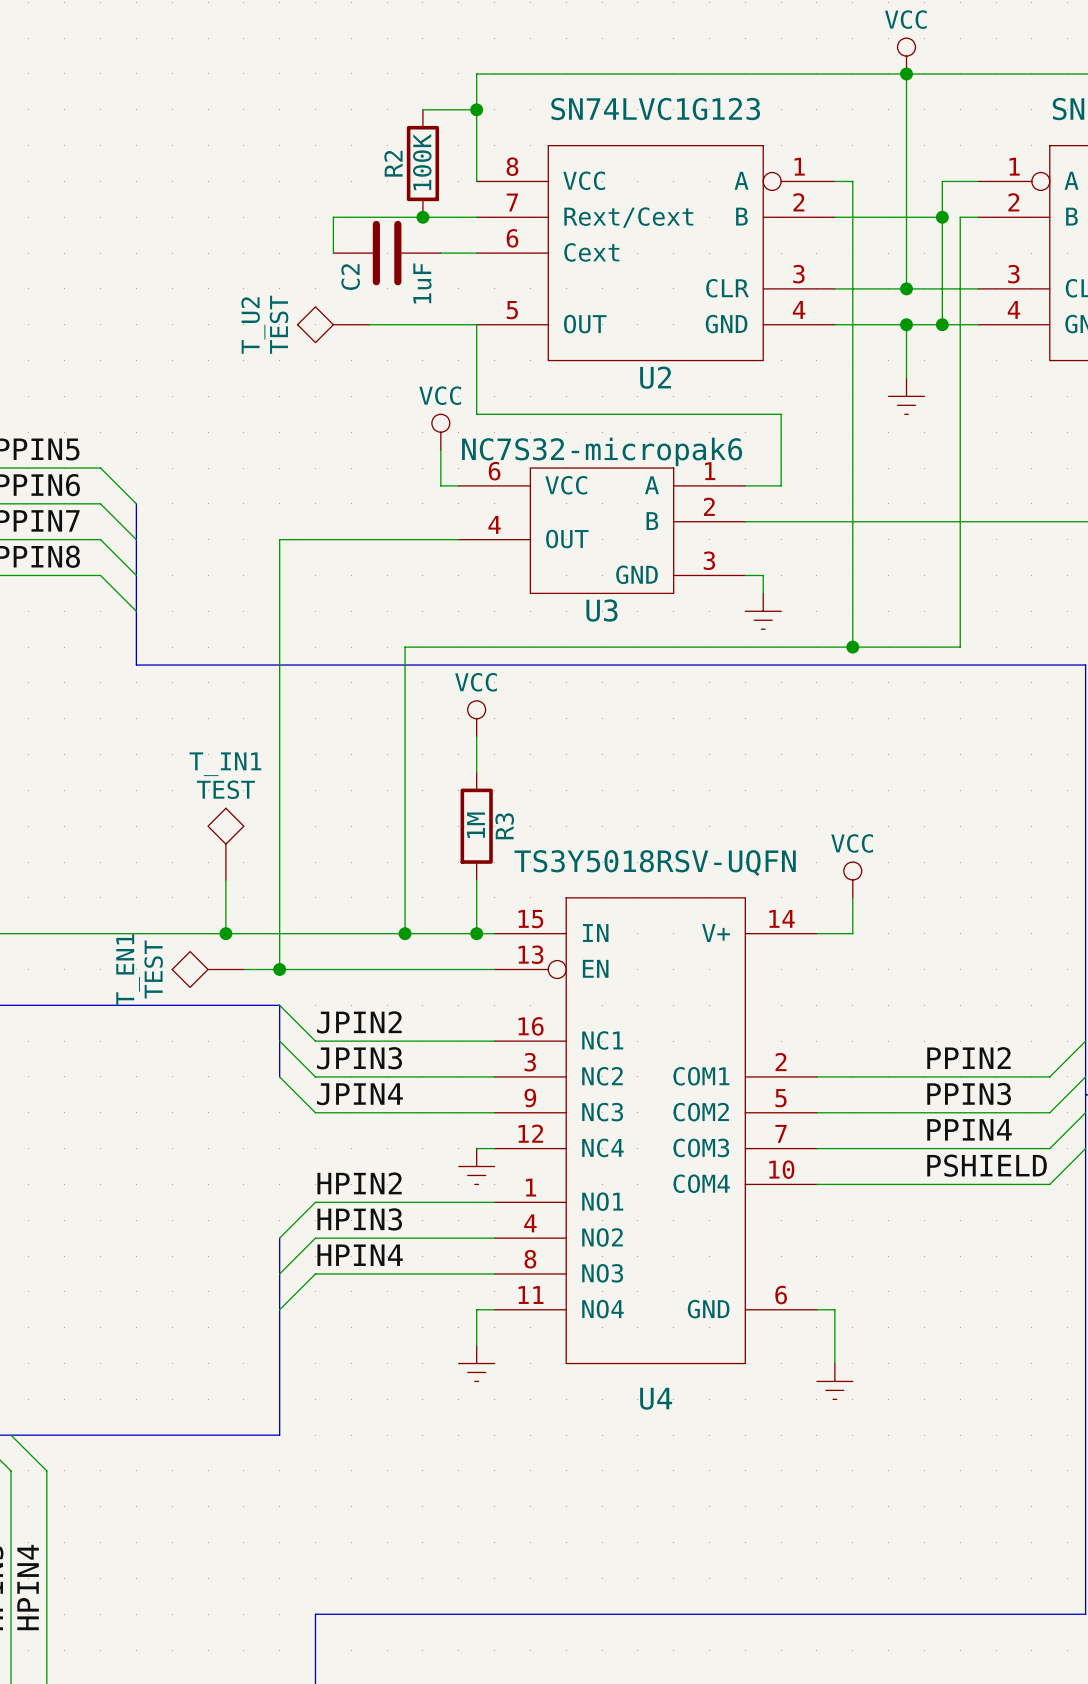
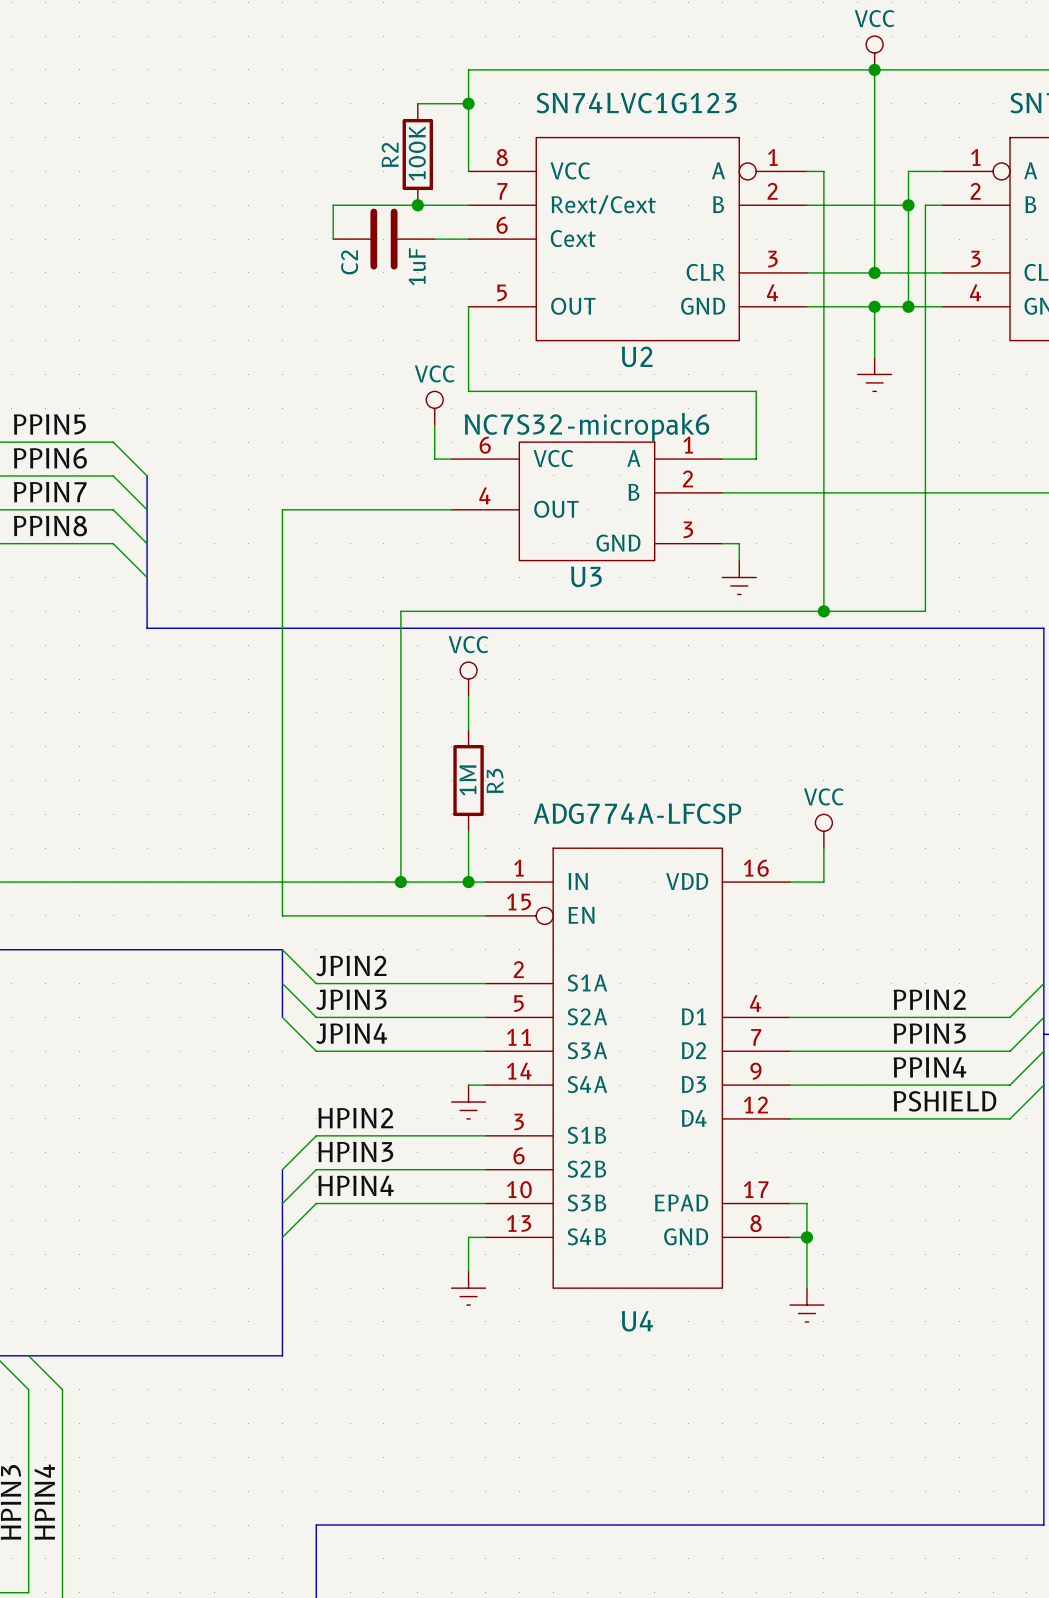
T_U2: TEST (333, 324) -> none
wire: (369, 324) (476, 324) -> none
T_IN1: TEST (225, 844) -> none
U4 value: TS3Y5018RSV-UQFN (655, 862) -> ADG774A-LFCSP (637, 813)
wire: (225, 879) (225, 933) -> none
U4 symbol: [494, 897, 817, 1364] -> [485, 848, 791, 1289]
junction: (225, 933) -> none
T_EN1: TEST (208, 969) -> none
wire: (243, 969) (279, 969) -> none
junction: (279, 969) -> none
wire: none -> (790, 1203) (806, 1203) (806, 1237)
junction: none -> (806, 1237)

